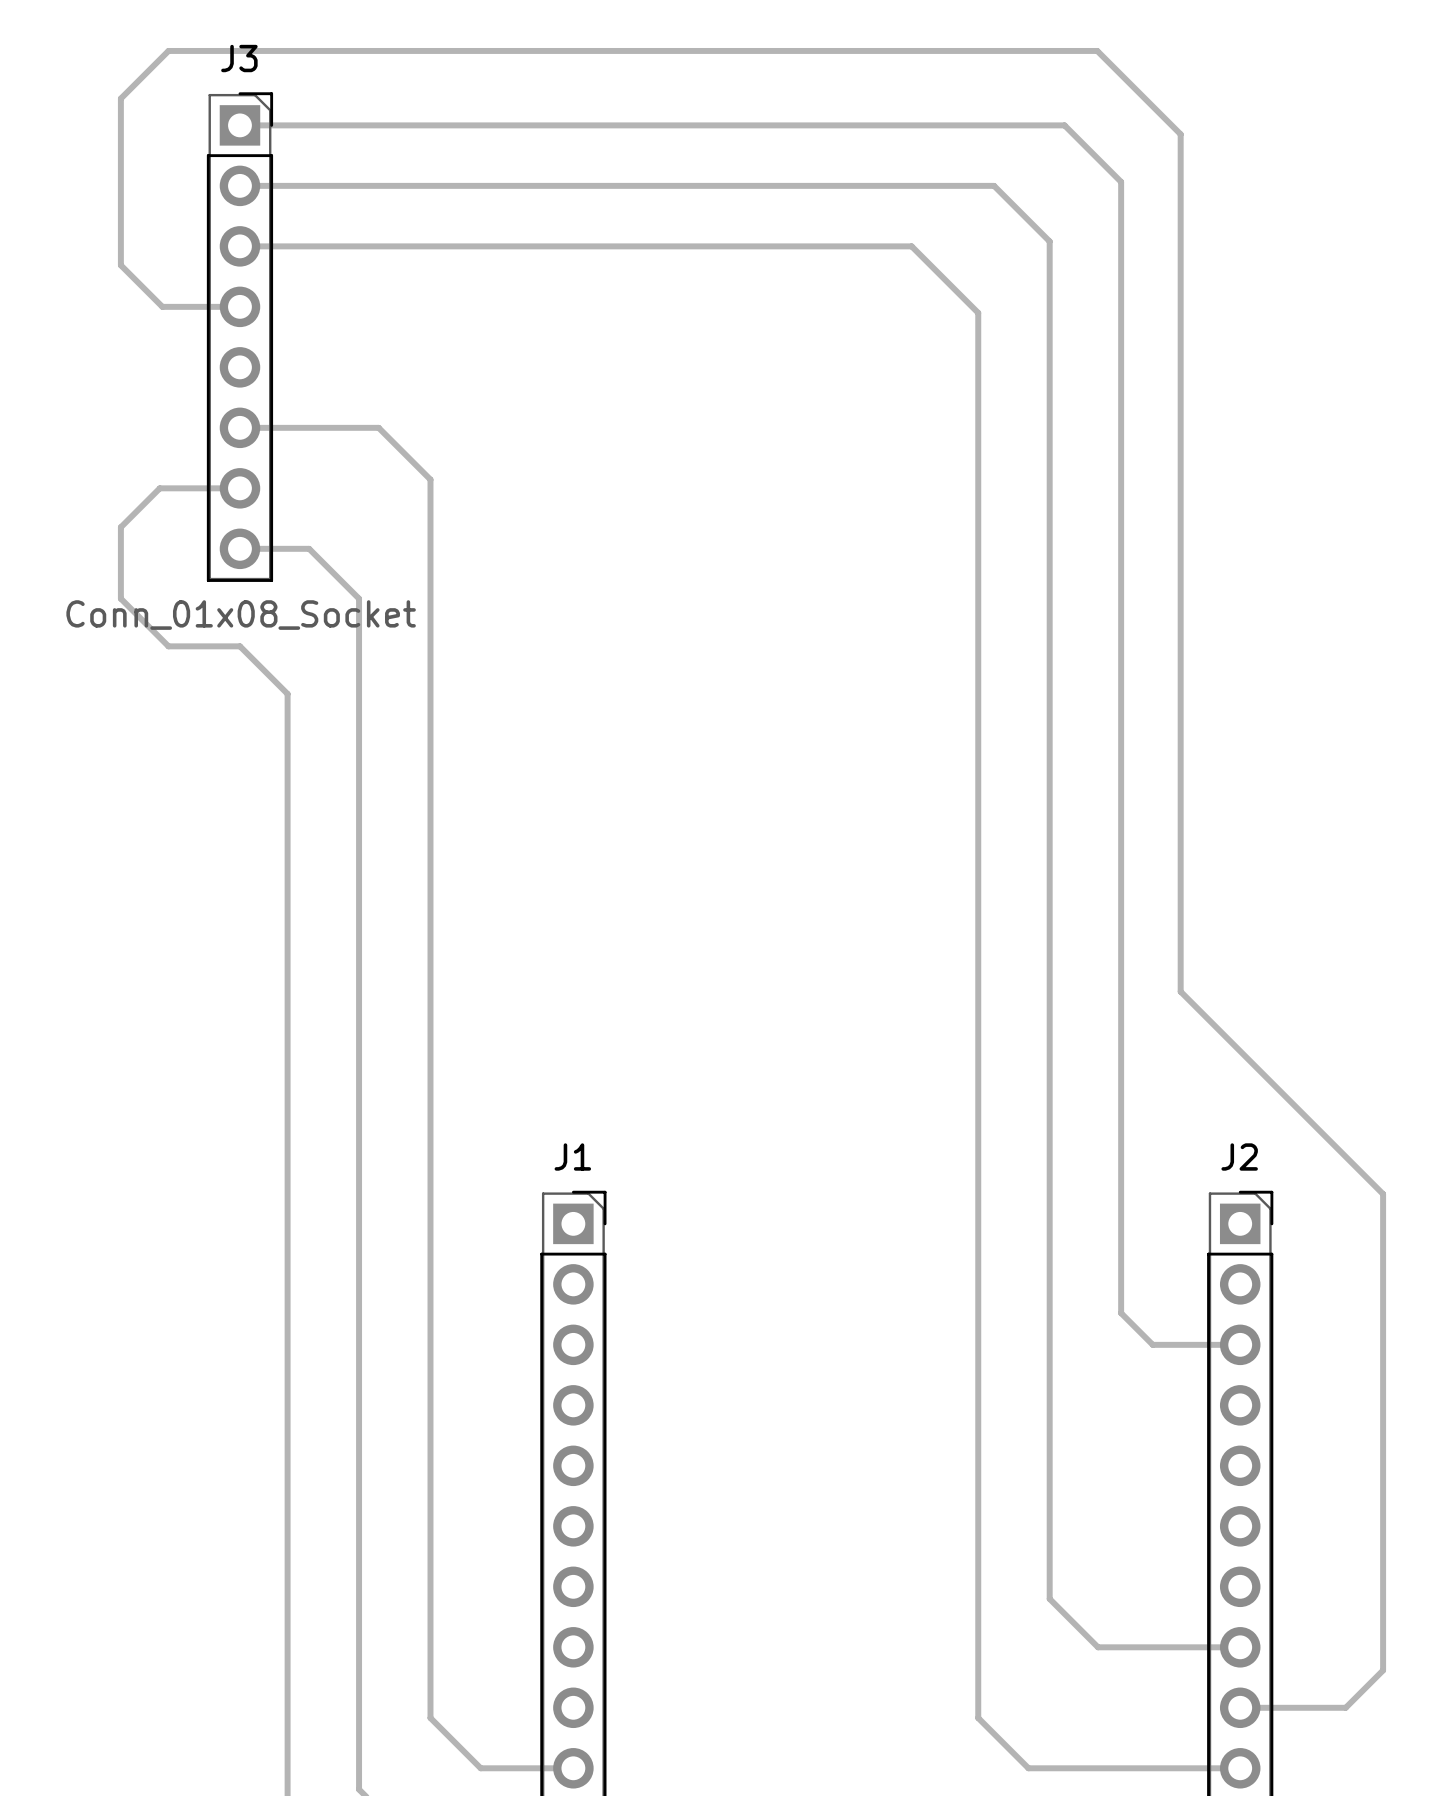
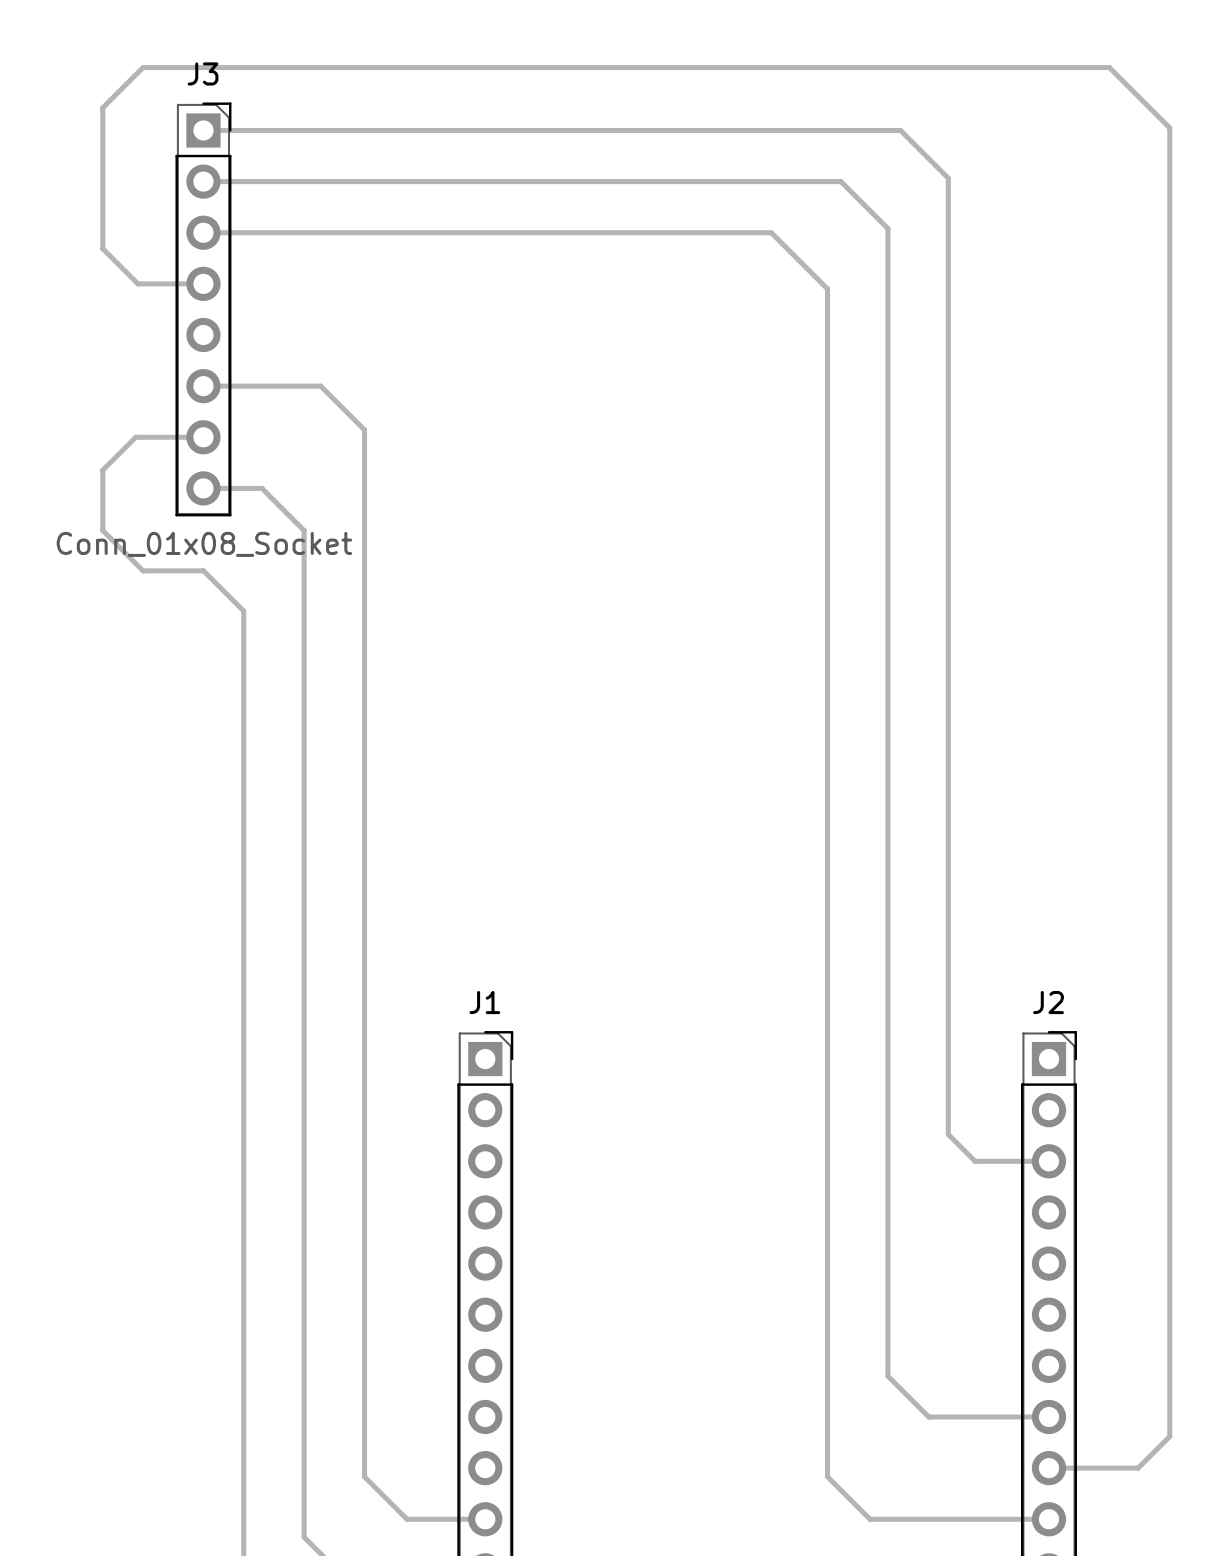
track: (1097, 50) (1180, 134) (1180, 991) (1383, 1194) -> (928, 67) (1109, 67) (1169, 127) (1169, 1033)

